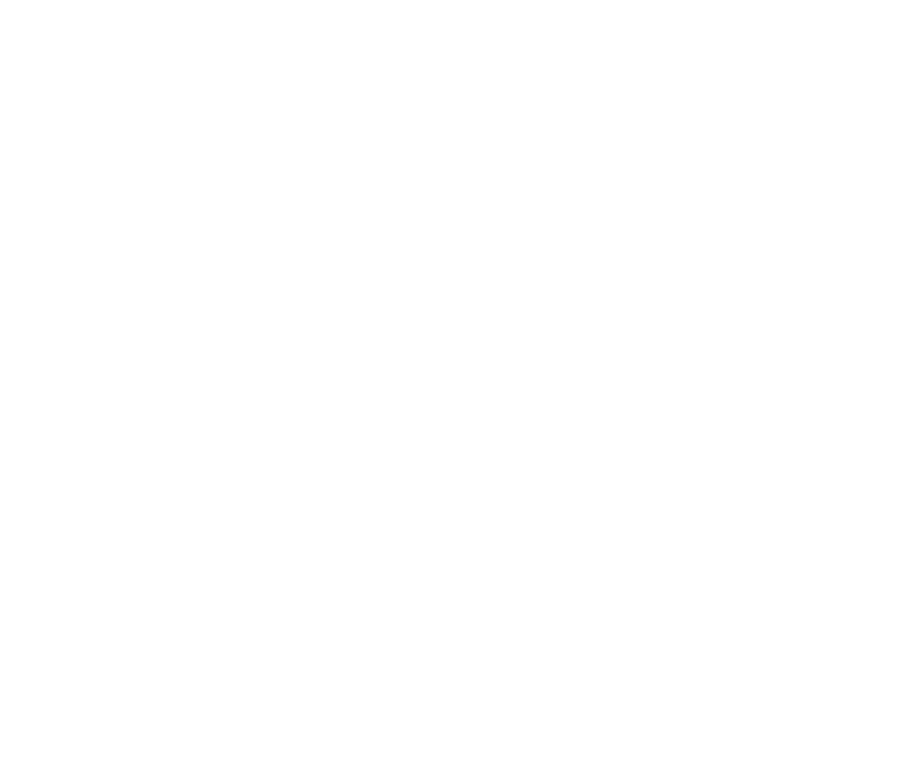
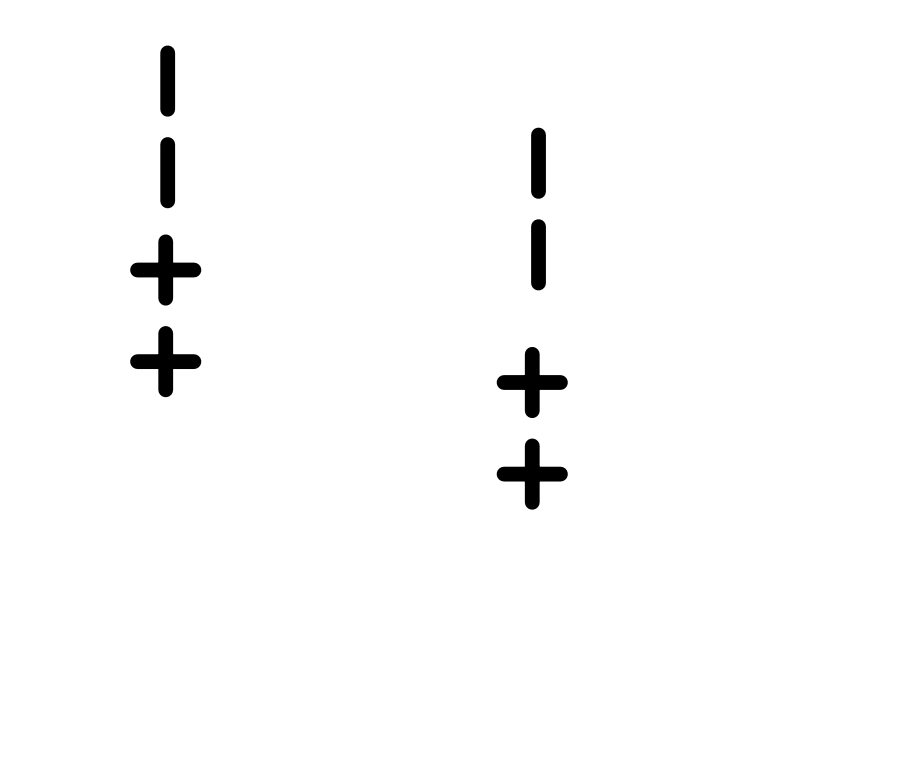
text: none -> -- (167, 126)
text: none -> -- (538, 209)
text: none -> ++ (165, 315)
text: none -> ++ (532, 428)

